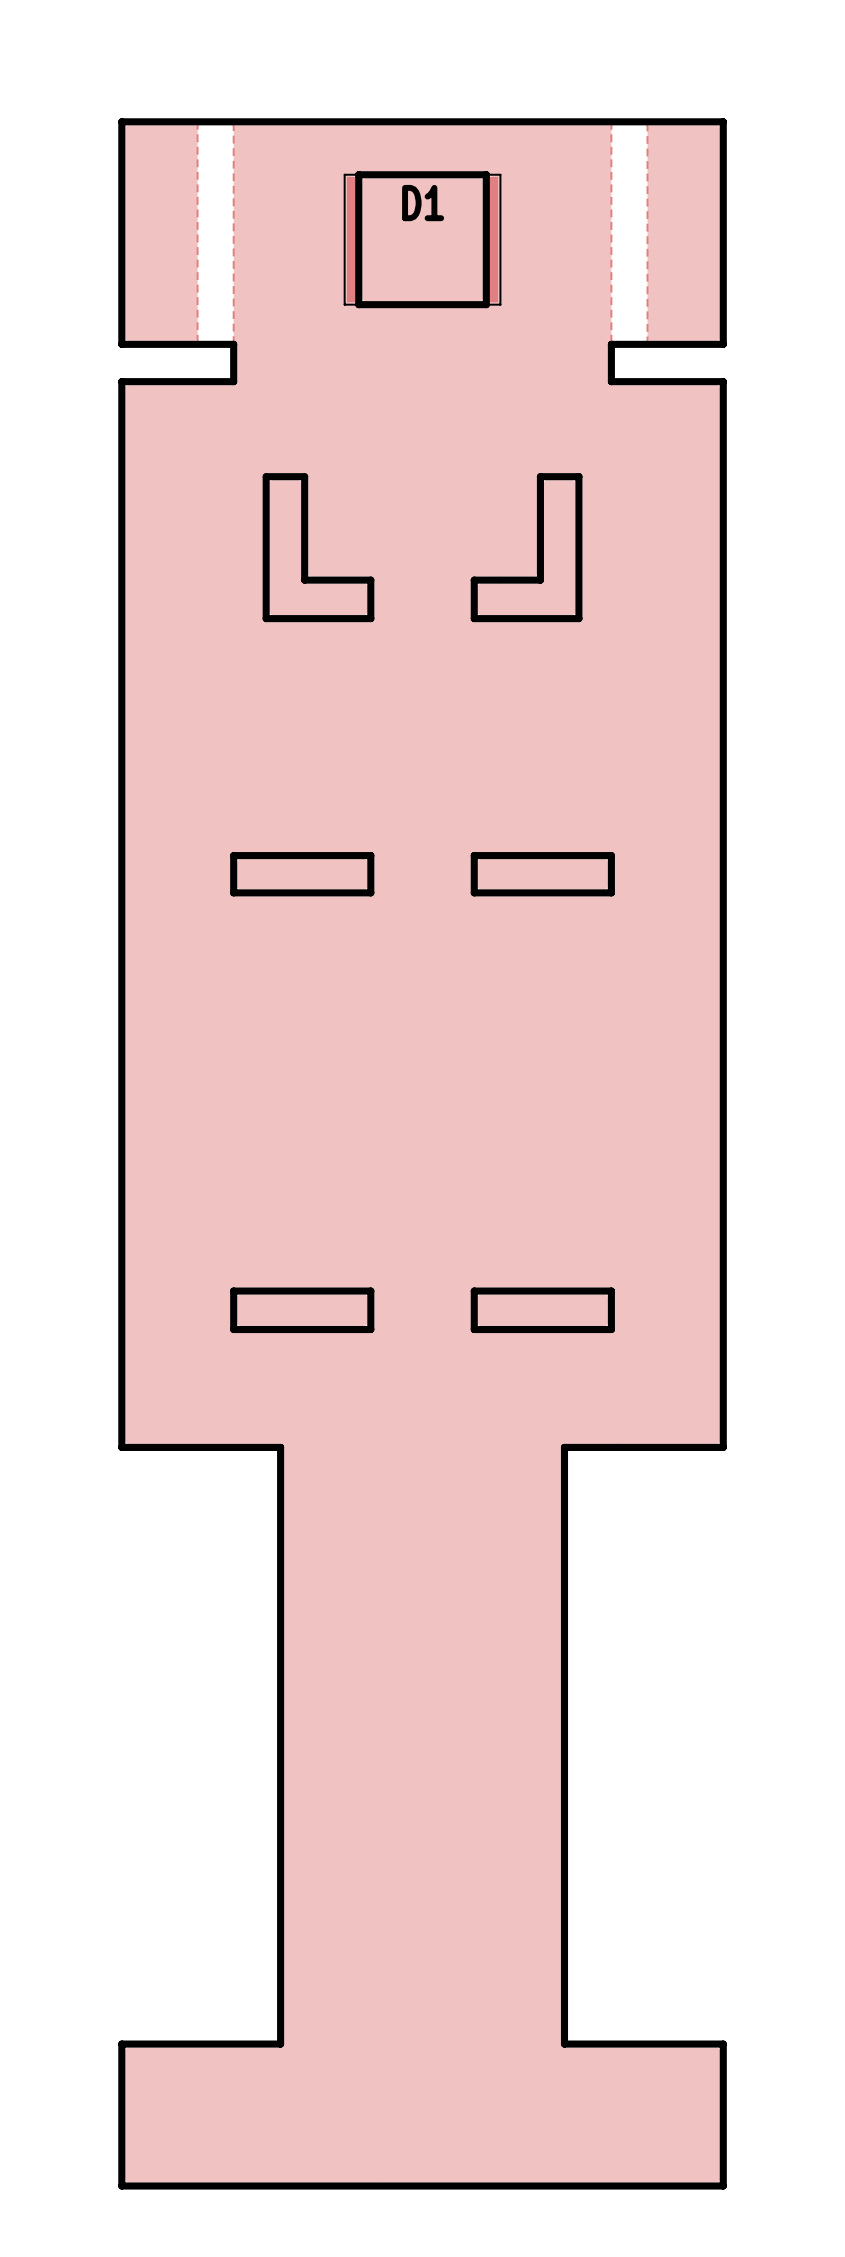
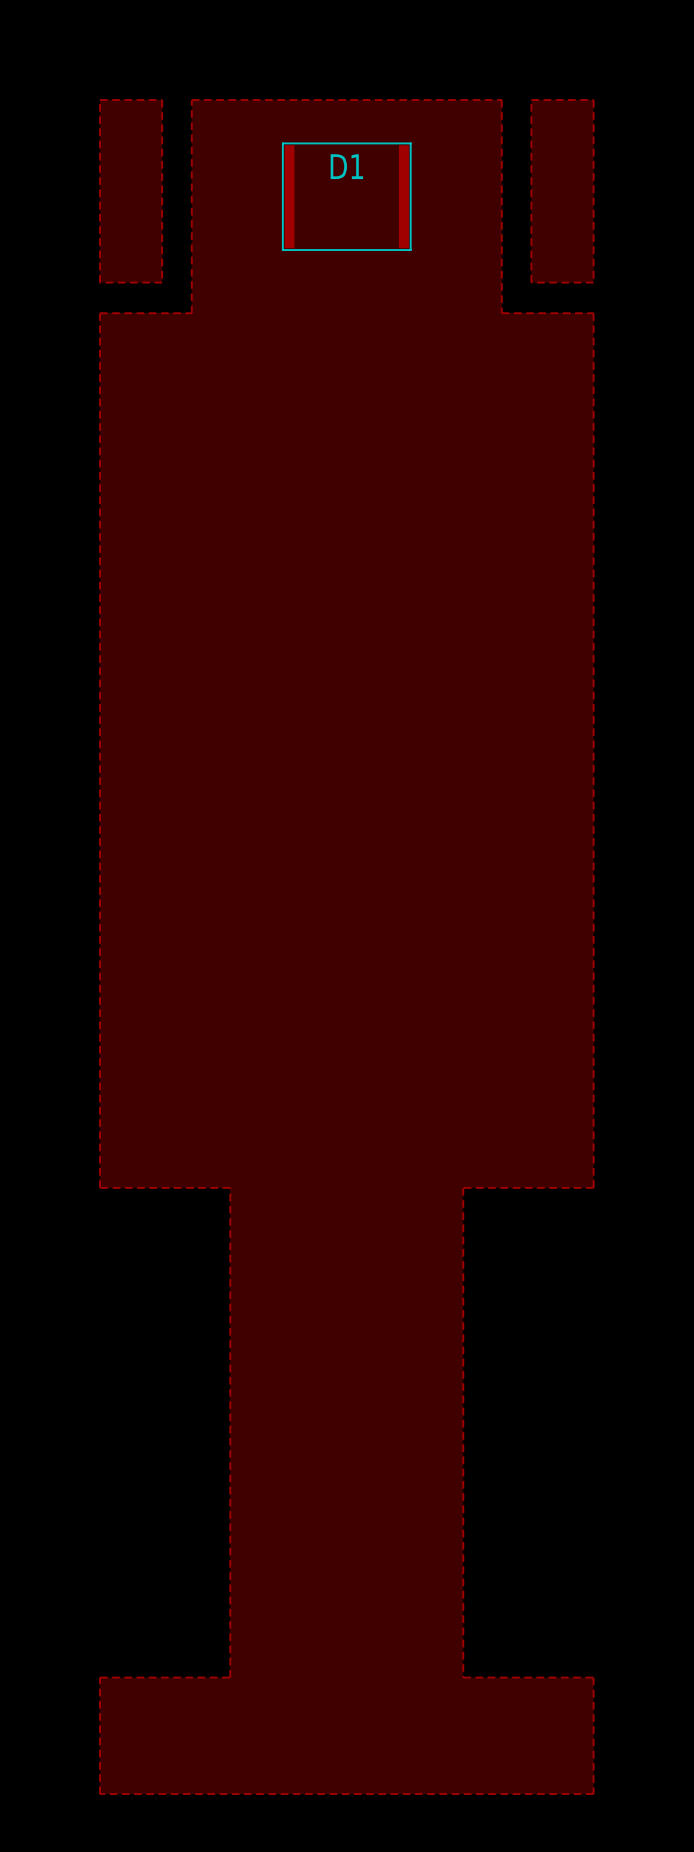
board edge: (121, 121) (121, 344) (233, 344) (233, 381) (121, 381) (121, 1447) (280, 1447) (280, 2044) (121, 2044) (121, 2186) (723, 2186) (723, 2044) (564, 2044) (564, 1447) (723, 1447) (723, 381) (611, 381) (611, 344) (723, 344) (723, 121) (121, 121) -> none
board edge: (358, 174) (358, 304) (486, 304) (486, 174) (358, 174) -> none
board edge: (266, 476) (304, 476) (304, 580) (370, 580) (370, 618) (266, 618) (266, 476) -> none
board edge: (540, 476) (578, 476) (578, 618) (474, 618) (474, 580) (540, 580) (540, 476) -> none
board edge: (233, 855) (233, 892) (370, 892) (370, 855) (233, 855) -> none
board edge: (474, 855) (474, 892) (611, 892) (611, 855) (474, 855) -> none
board edge: (233, 1291) (370, 1291) (370, 1329) (233, 1329) (233, 1291) -> none
board edge: (474, 1291) (611, 1291) (611, 1329) (474, 1329) (474, 1291) -> none

